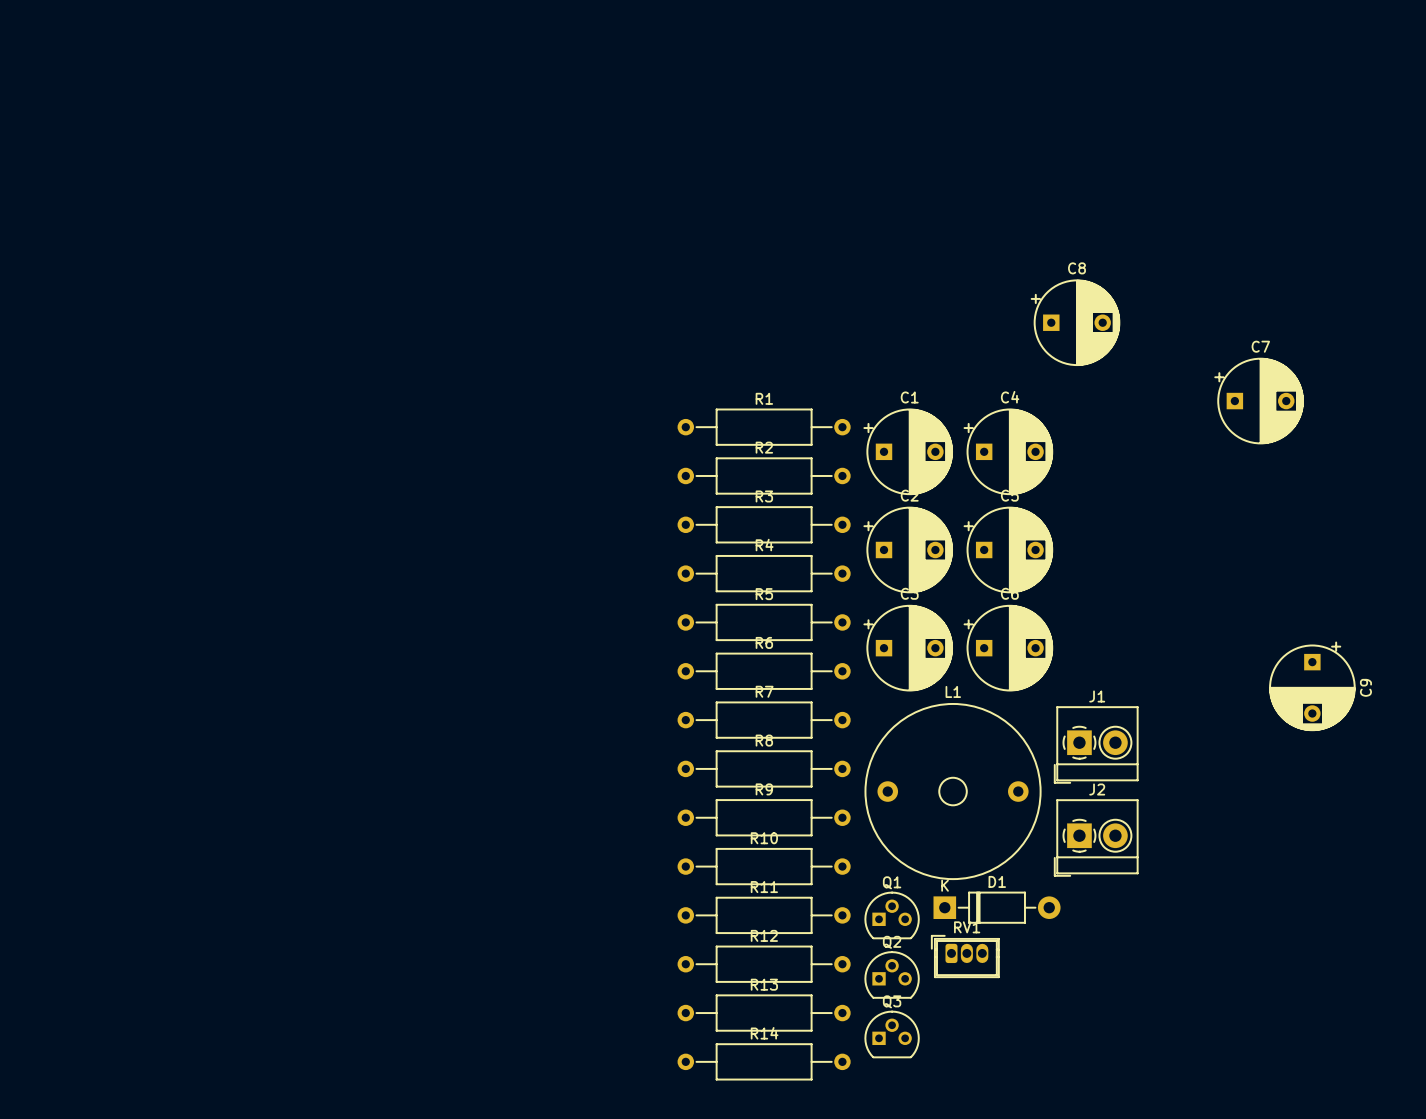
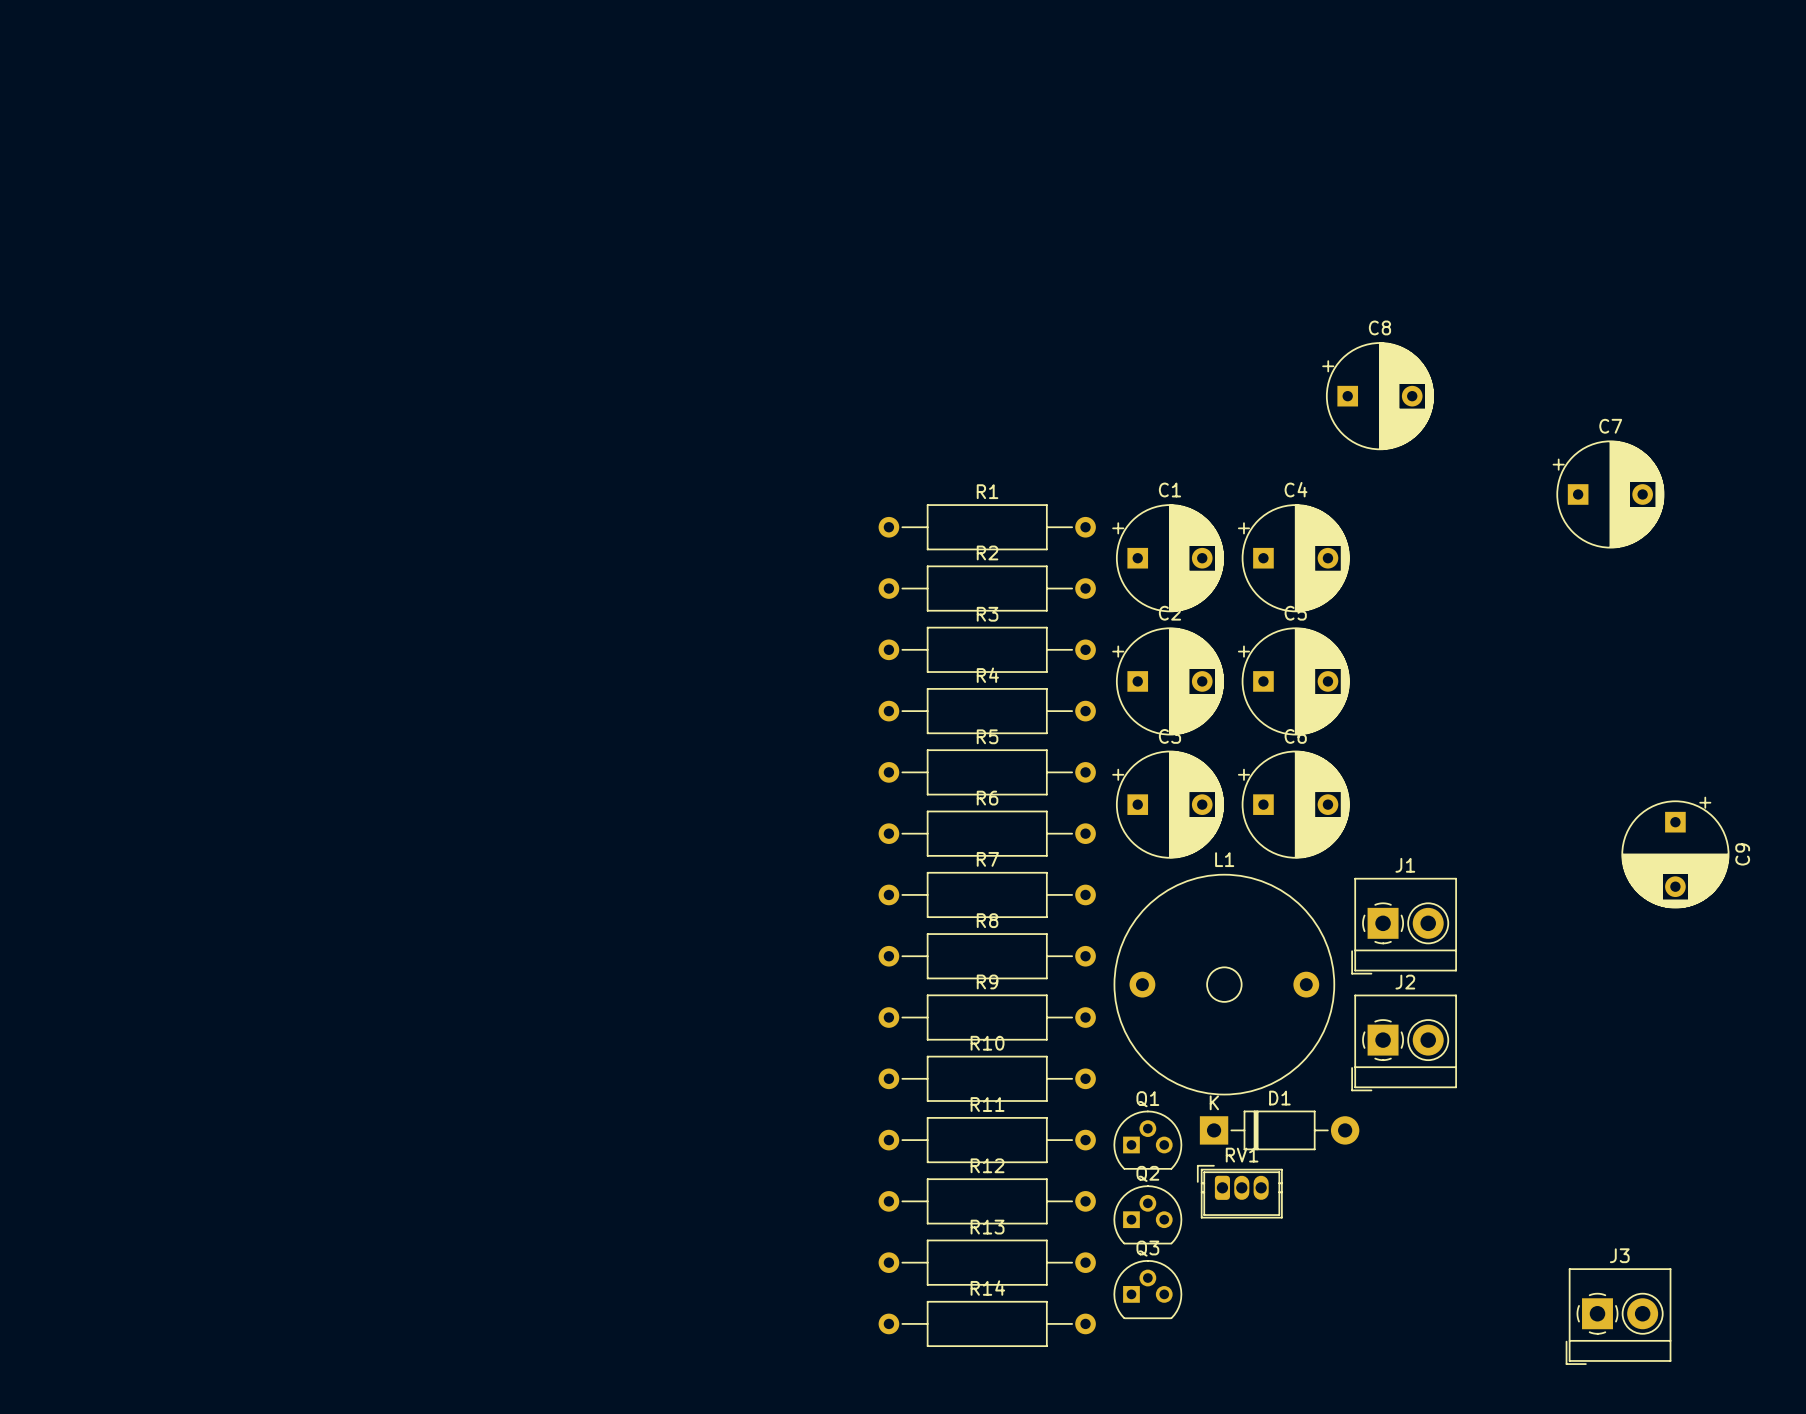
J3: none -> (1618, 1316)

